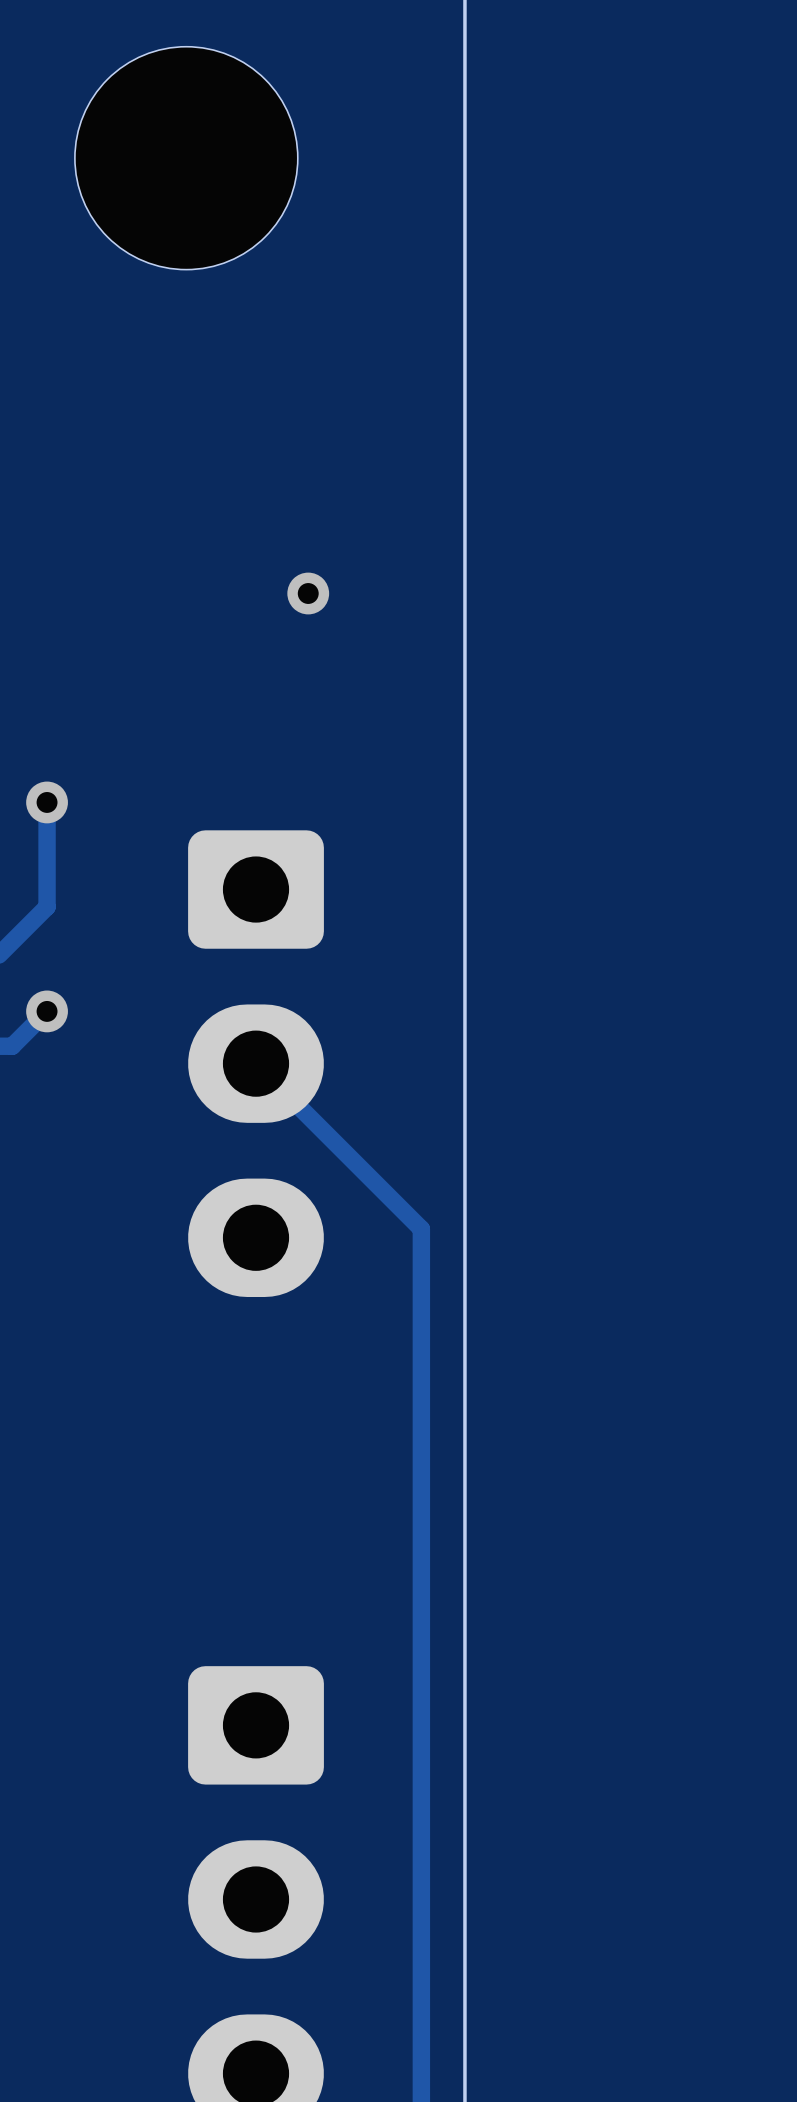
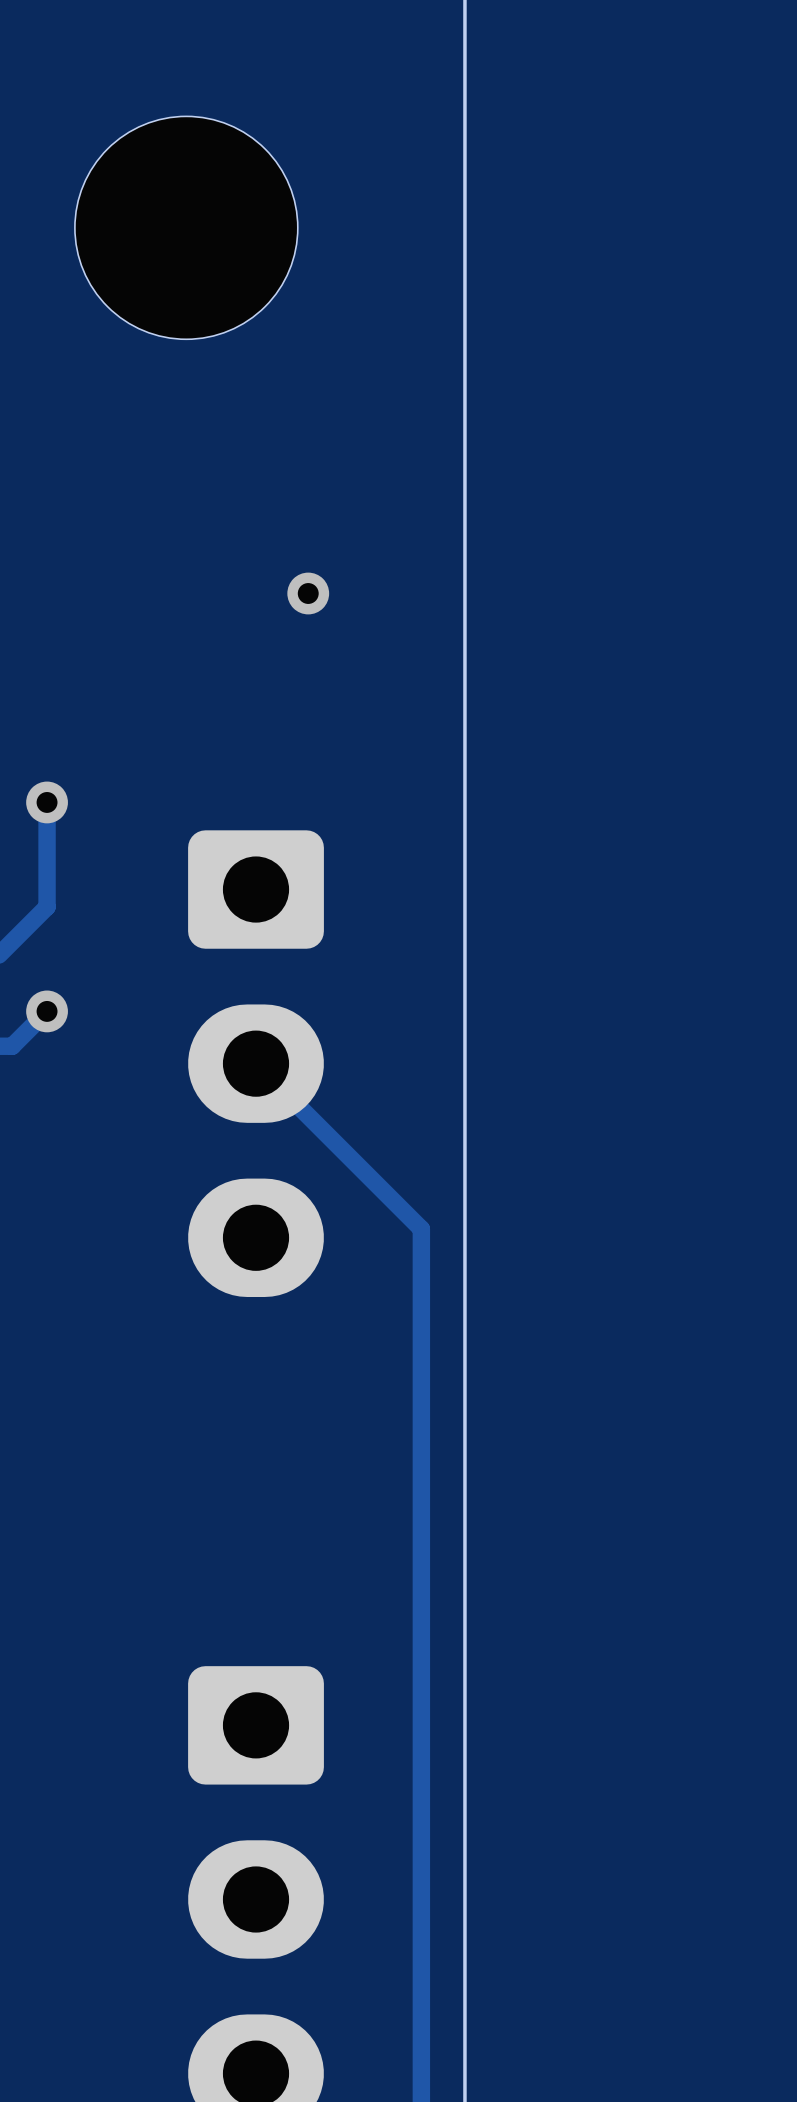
part position: (186, 158) -> (186, 227)

